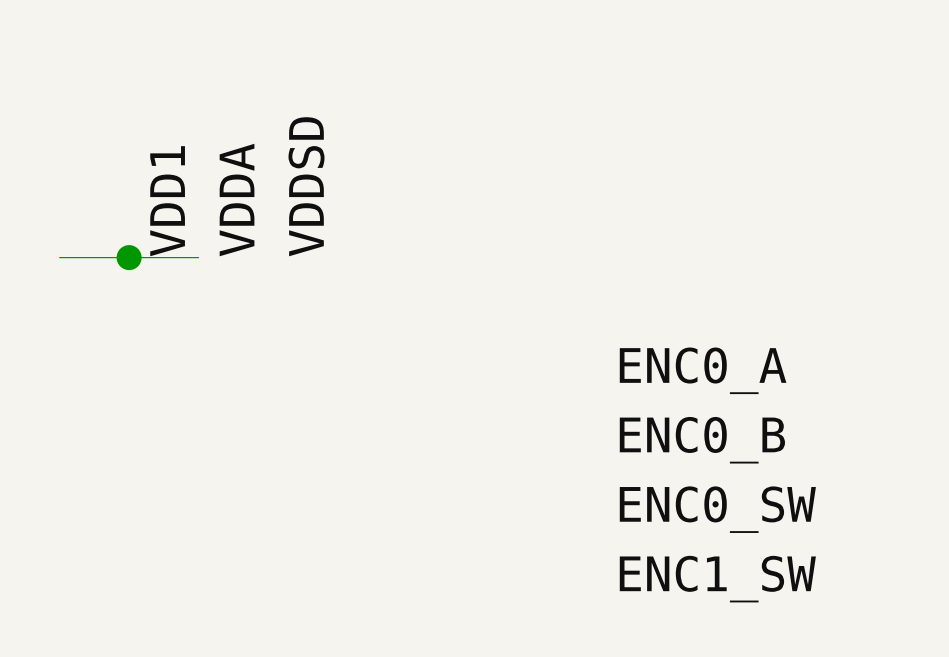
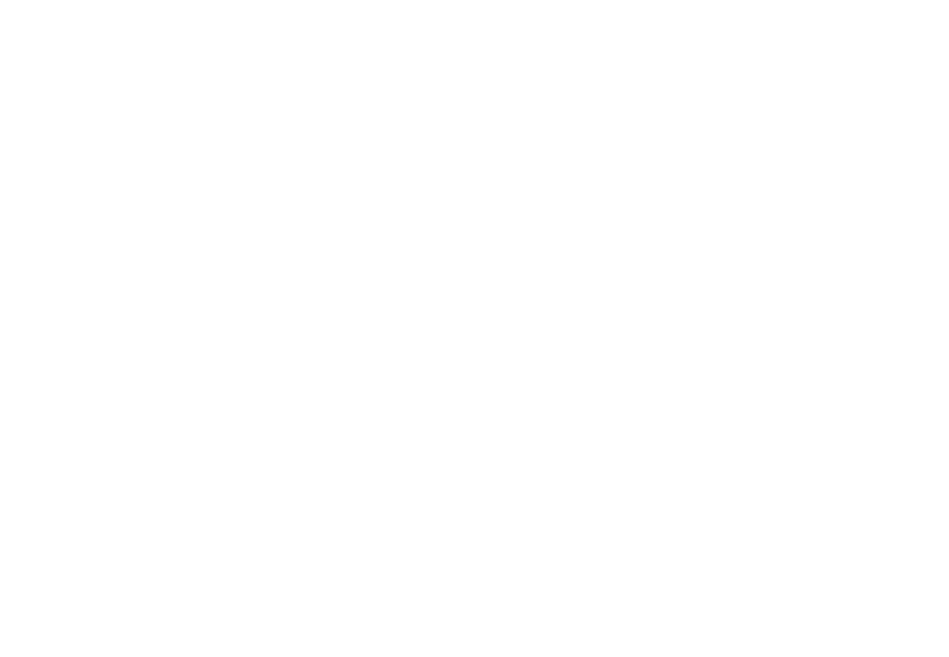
label: VDDSD (306, 186) -> none
label: VDDA (237, 200) -> none
label: VDD1 (167, 201) -> none
wire: (59, 257) (198, 257) -> none
junction: (129, 257) -> none
label: ENC0_A (703, 370) -> none
label: ENC0_B (702, 440) -> none
label: ENC0_SW (717, 509) -> none
label: ENC1_SW (717, 579) -> none

